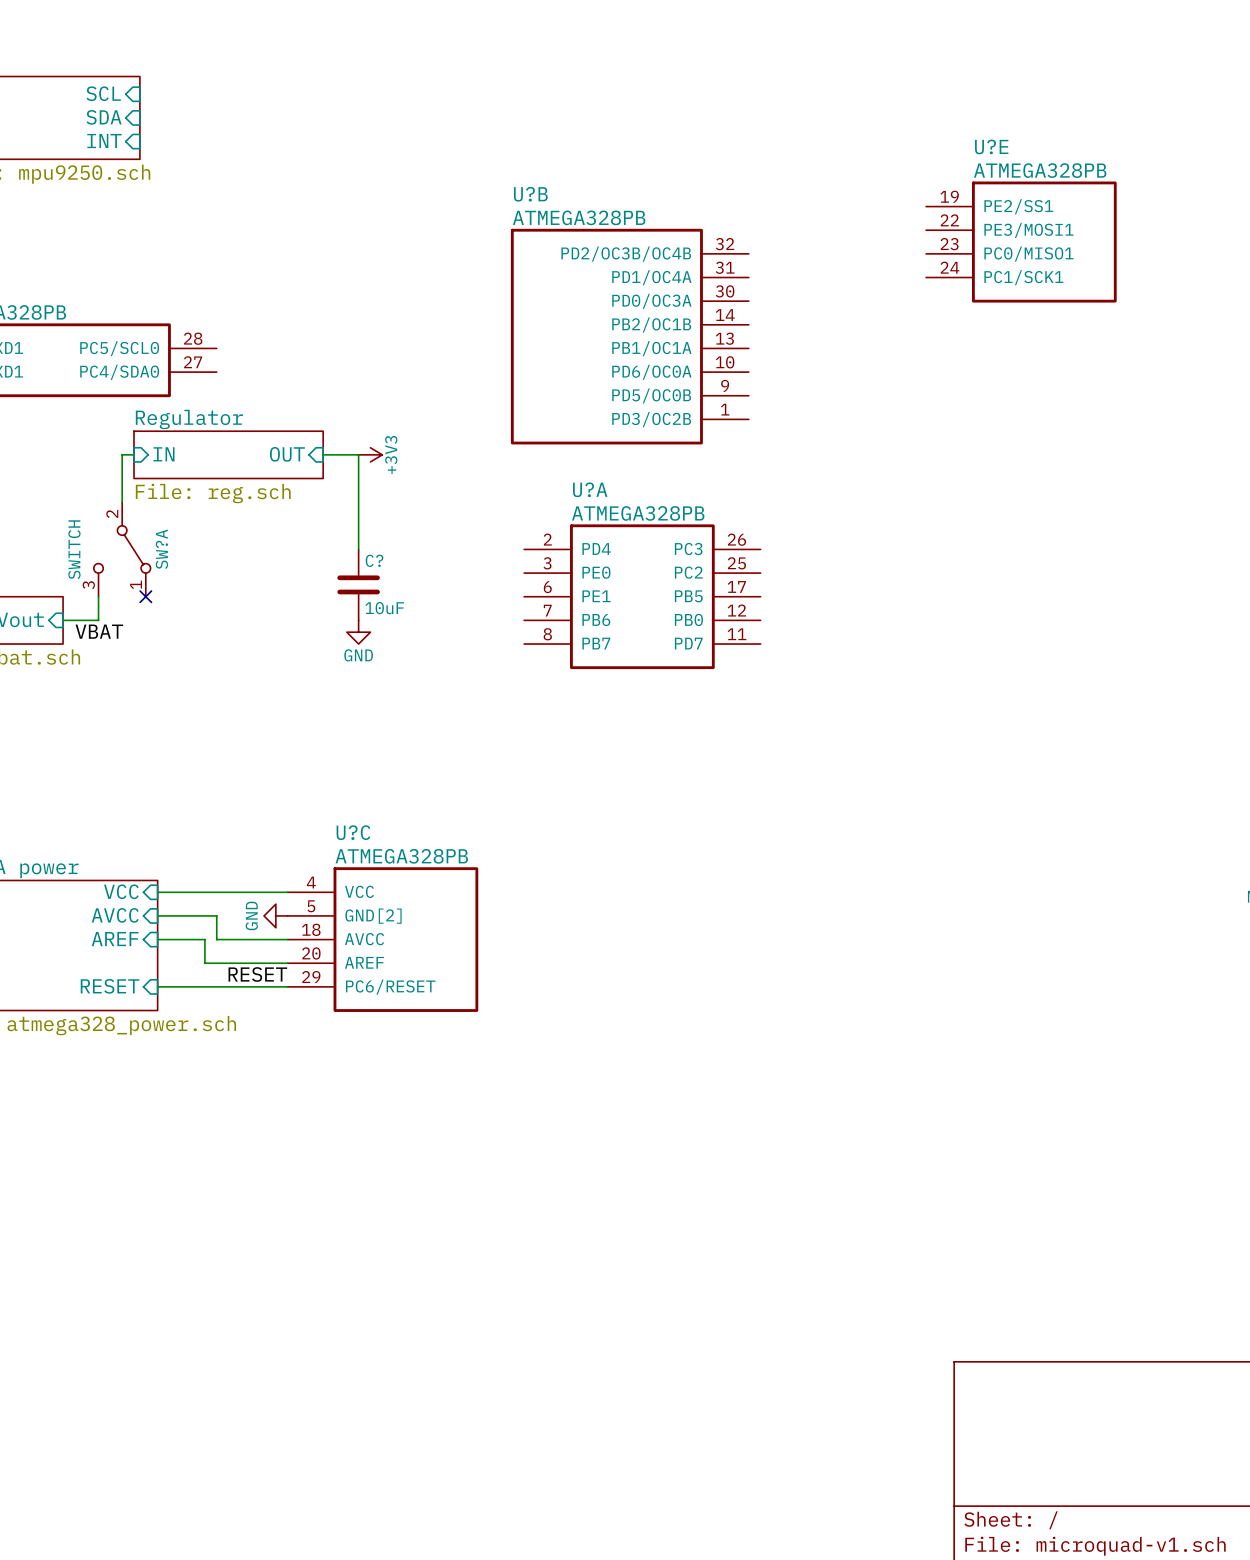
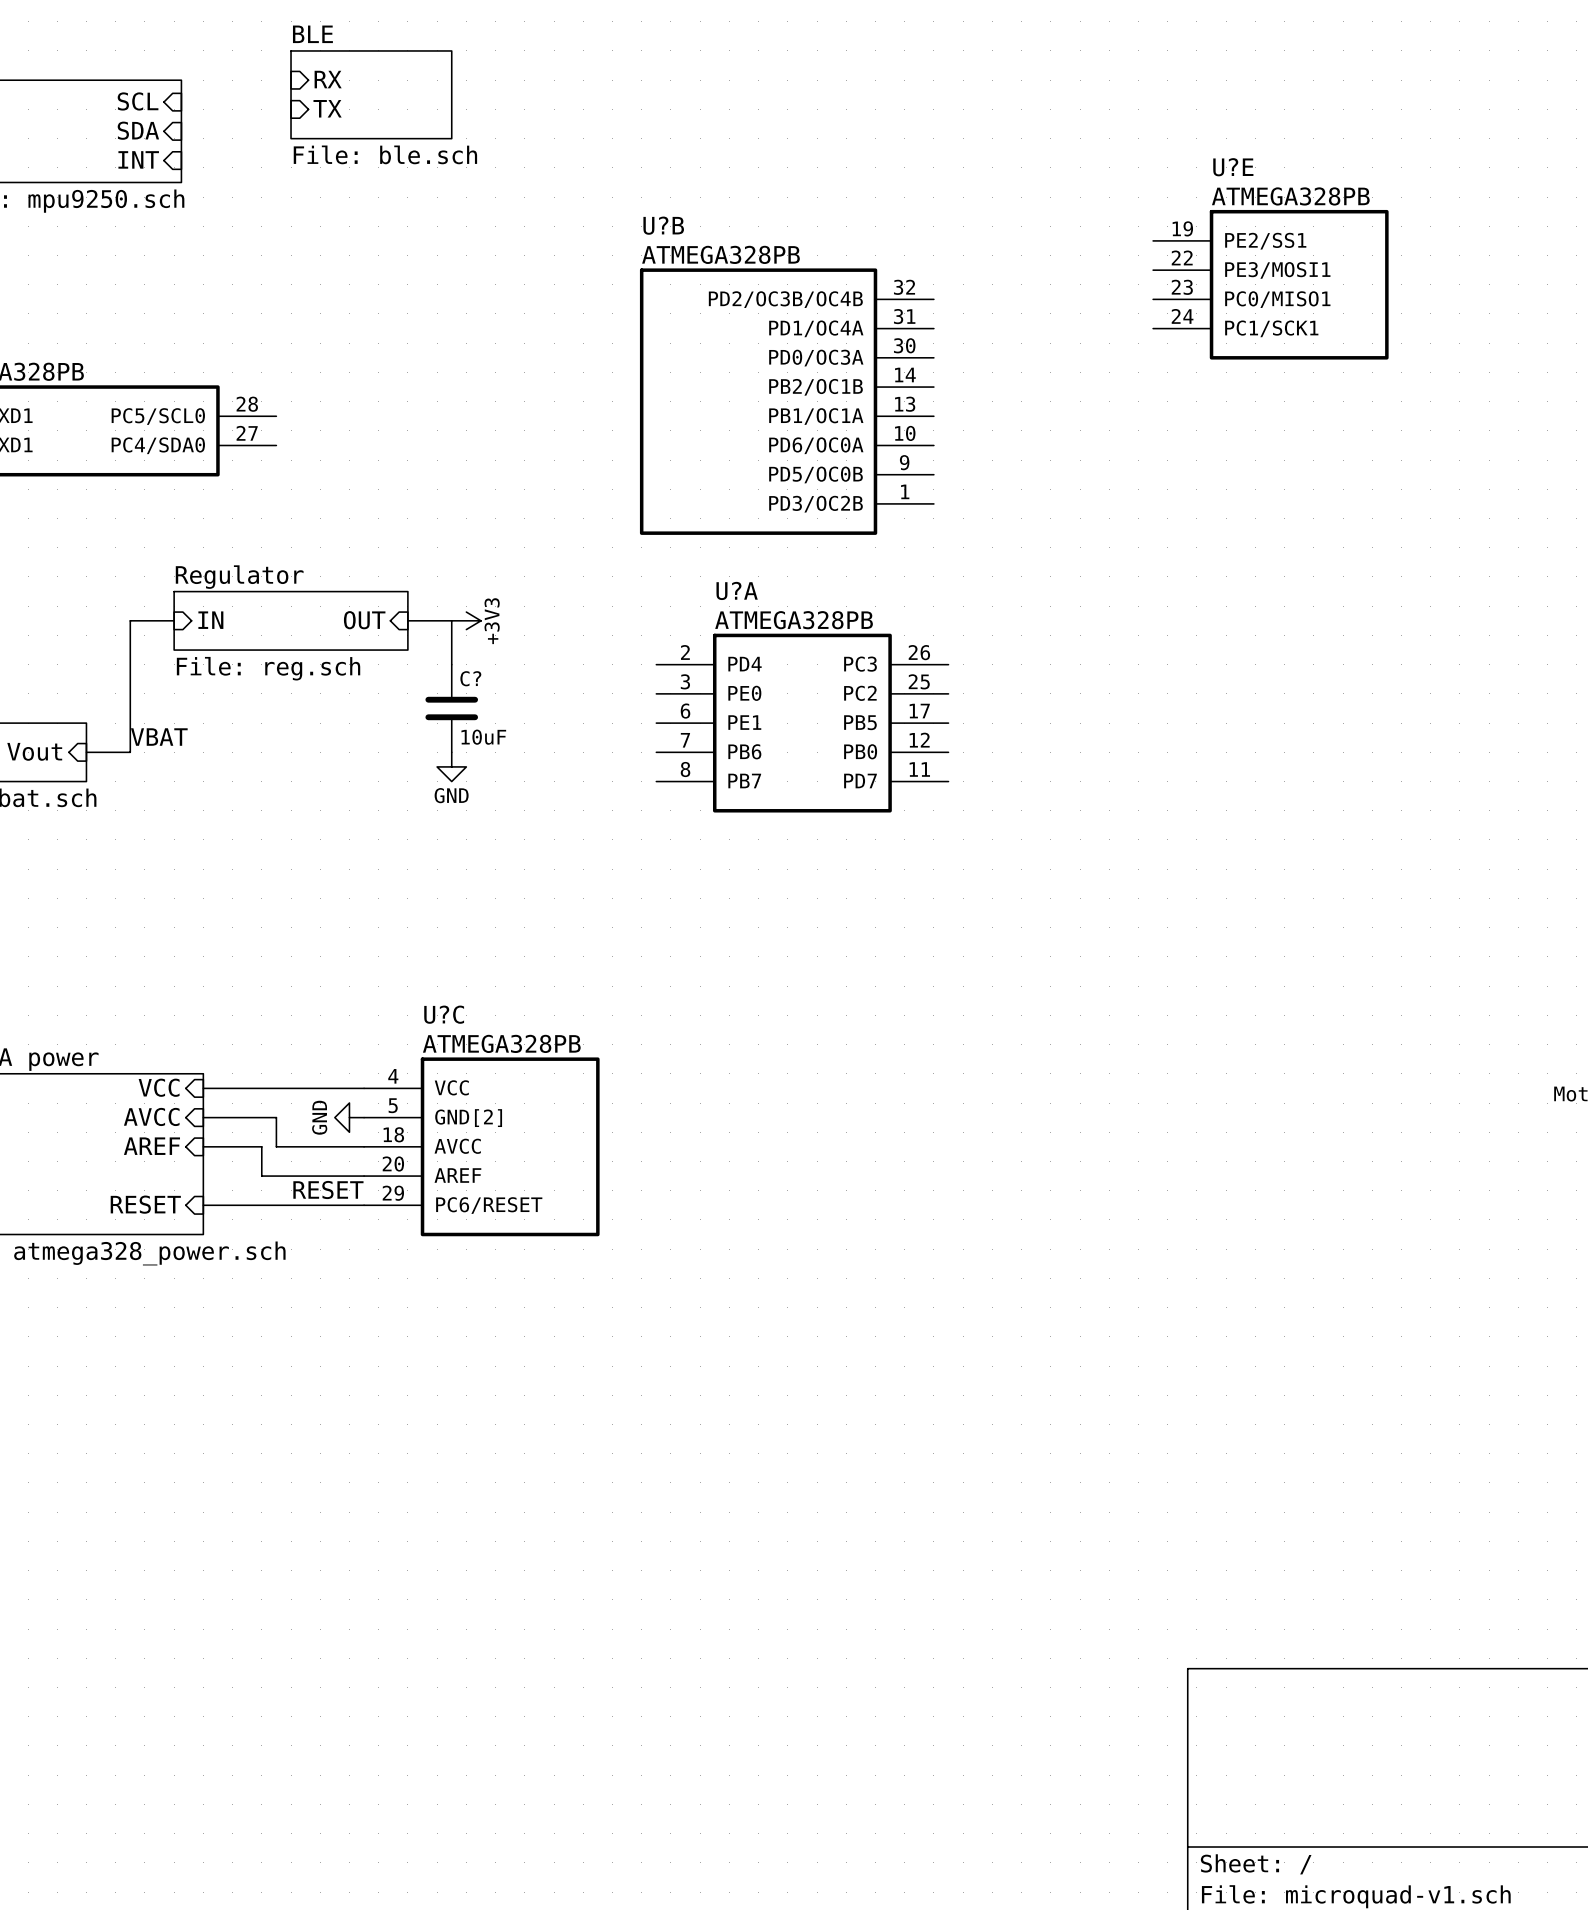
sheet pin: none -> RX (328, 79)
sheet BLE: none -> File: ble.sch (371, 94)
sheet pin: none -> TX (327, 108)
wire: (133, 454) (122, 454) (122, 502) -> none
sheet pin position: IN (163, 454) -> IN (210, 620)
sheet Regulator position: (228, 454) -> (291, 620)
sheet pin position: OUT (287, 454) -> OUT (364, 620)
wire: (323, 454) (358, 454) (358, 513) -> (407, 620) (451, 620)
power symbol position: +3V3 (370, 454) -> +3V3 (466, 620)
wire: none -> (174, 620) (130, 620) (130, 723)
SW?A: SWITCH (122, 549) -> none
no-connect mark: (145, 596) -> none
label position: VBAT (99, 631) -> VBAT (159, 737)

